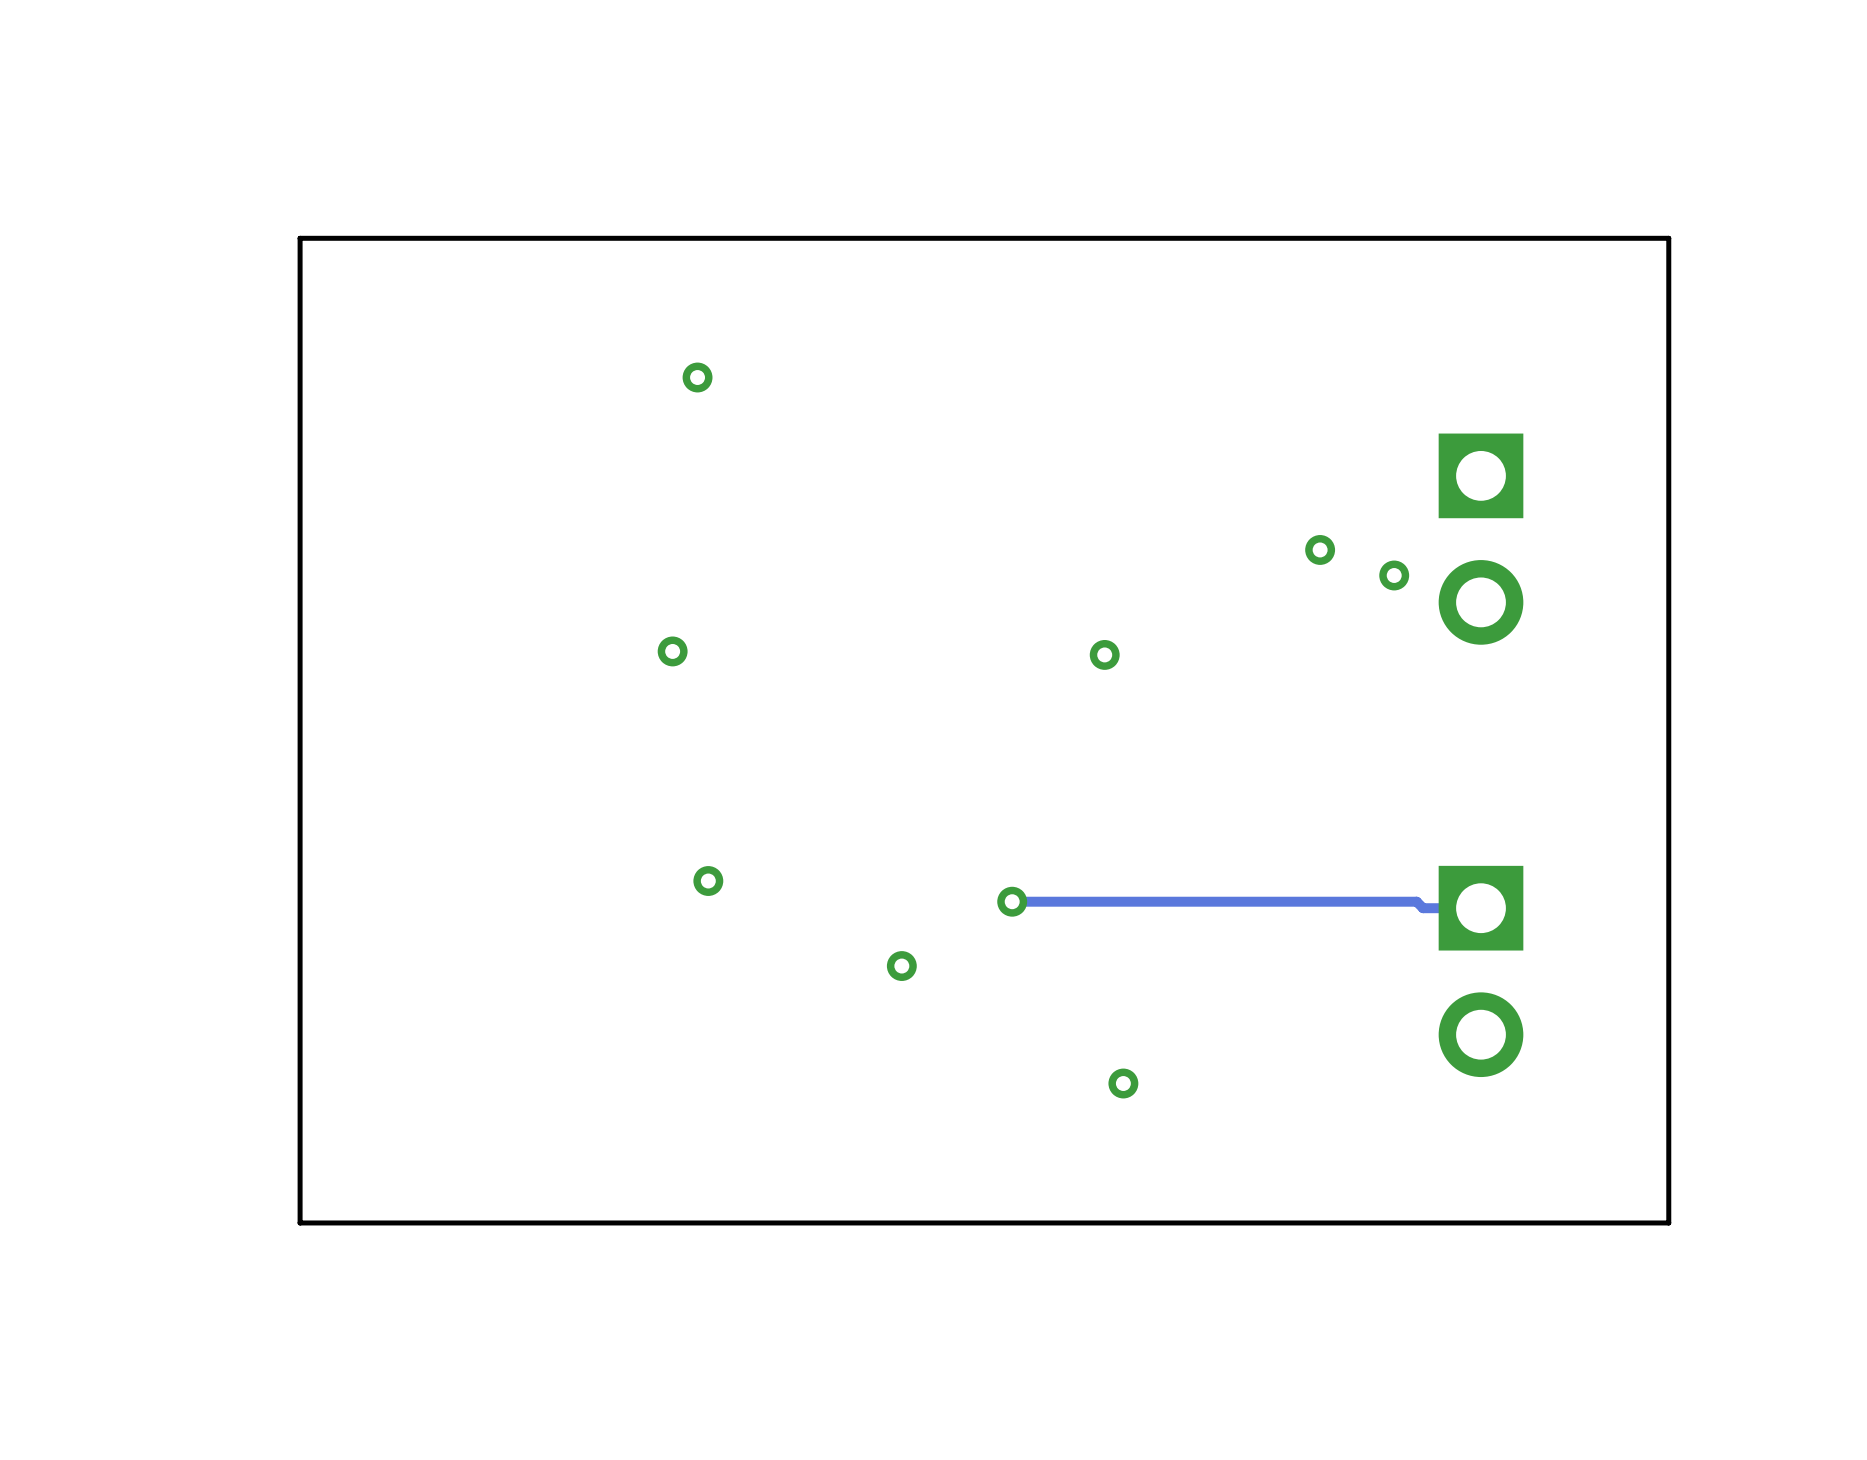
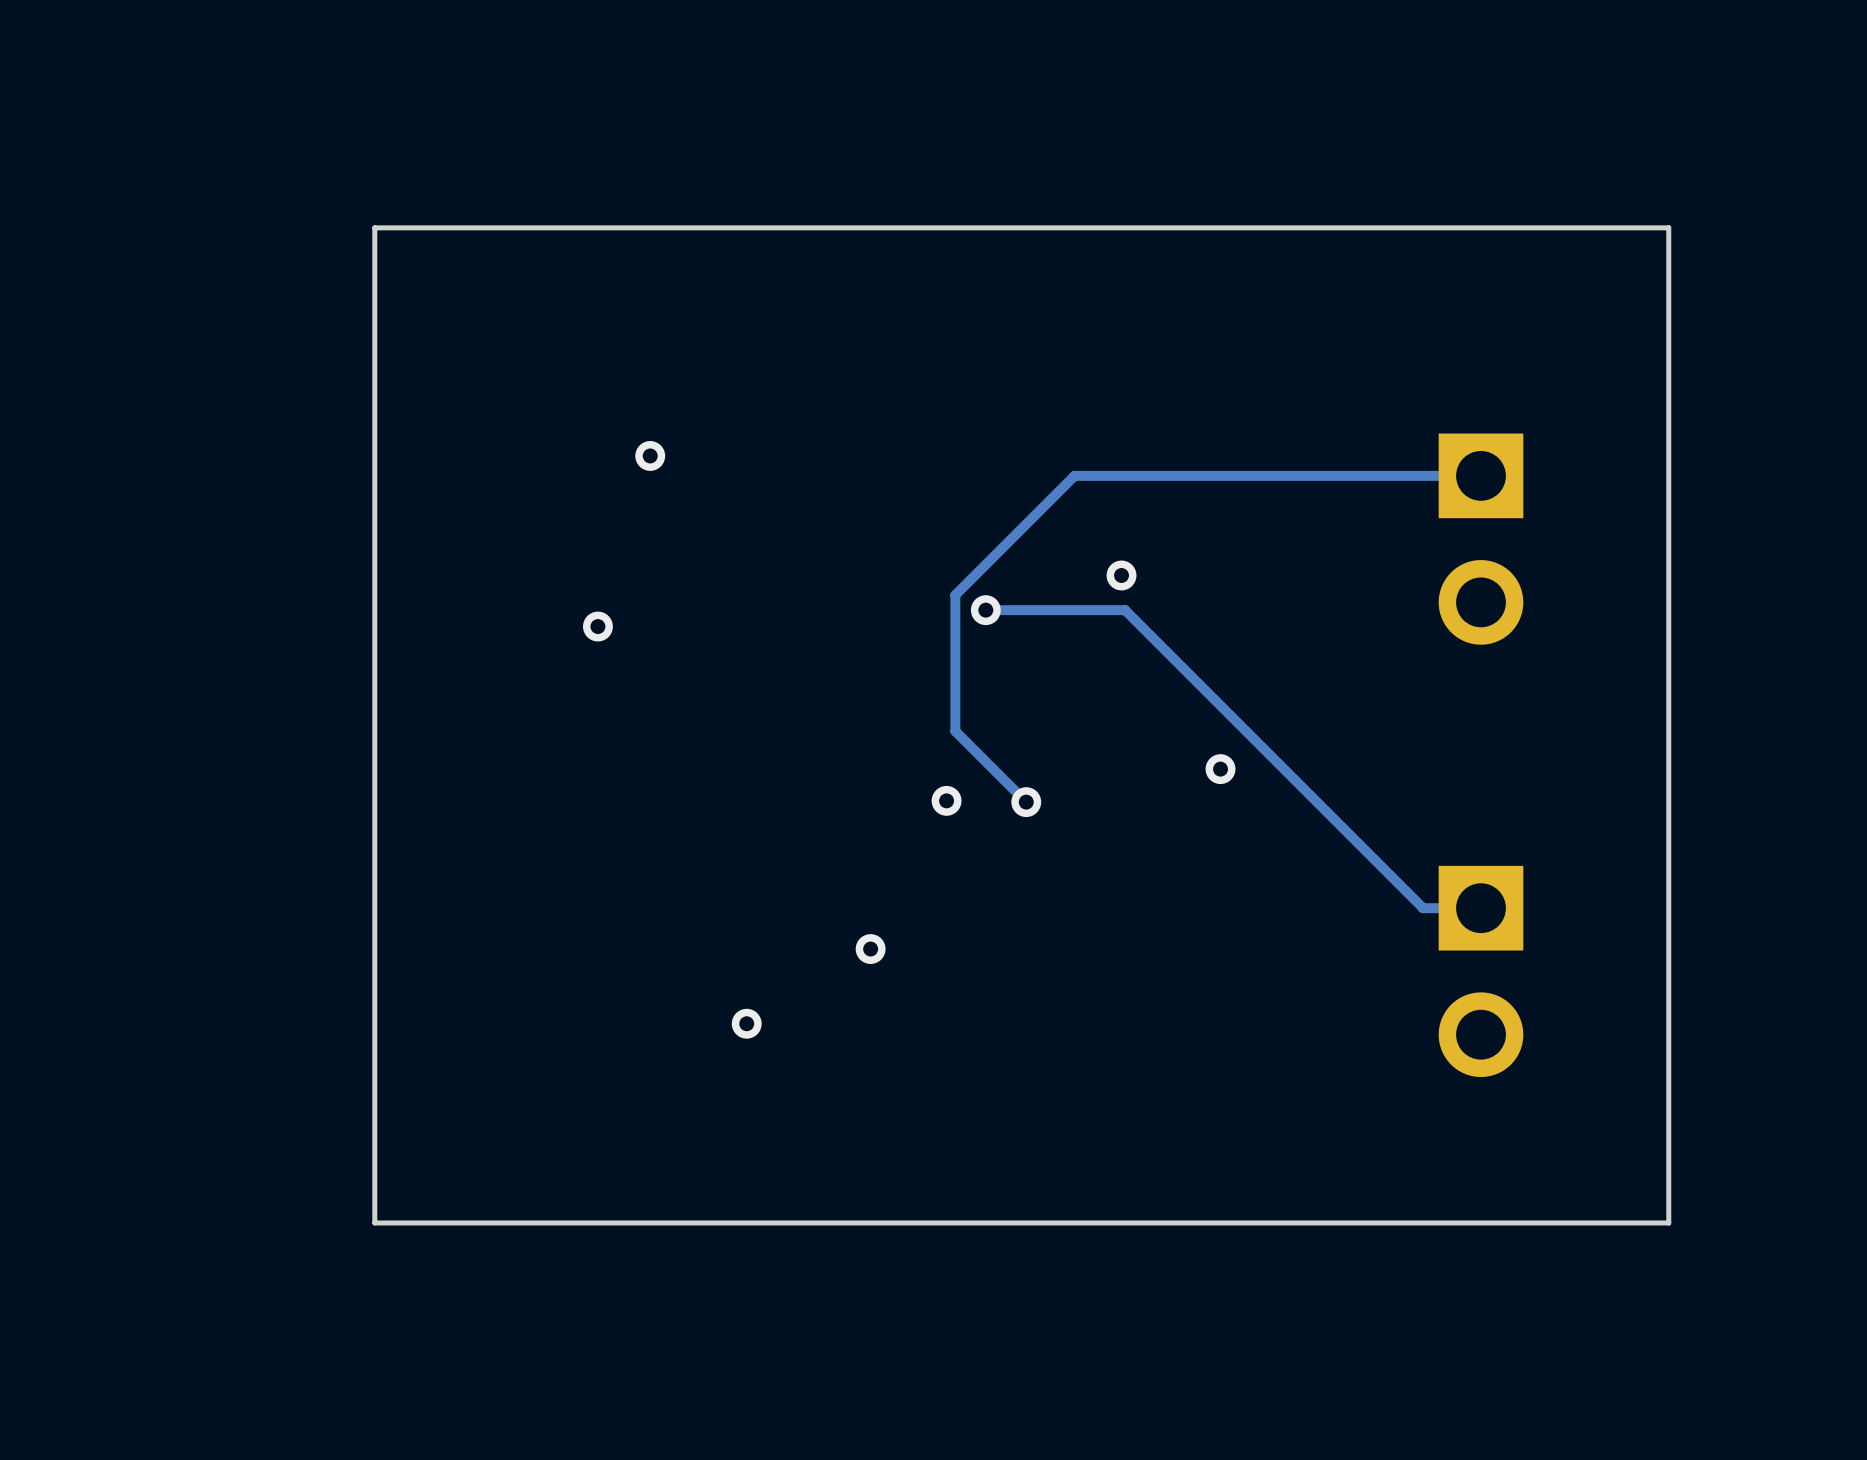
board edge: (1668, 238) (300, 238) (300, 1222) (374, 1222) -> (1668, 238) (1668, 227) (374, 227) (374, 1222)
via position: (697, 377) -> (650, 455)
track: none -> (1481, 475) (1074, 475) (955, 595) (955, 731) (1026, 802)
via: (1320, 549) -> none
via: none -> (1121, 575)
via: (1394, 575) -> none
via: none -> (985, 610)
via position: (672, 651) -> (597, 626)
via: (1104, 654) -> none
via: none -> (1220, 769)
via: none -> (946, 800)
via: none -> (1026, 802)
via: (708, 881) -> none
via: (1012, 901) -> none
track: (1416, 901) (1012, 901) -> (1416, 901) (1125, 610) (985, 610)
via position: (901, 966) -> (870, 949)
via: none -> (746, 1023)
via: (1123, 1083) -> none

